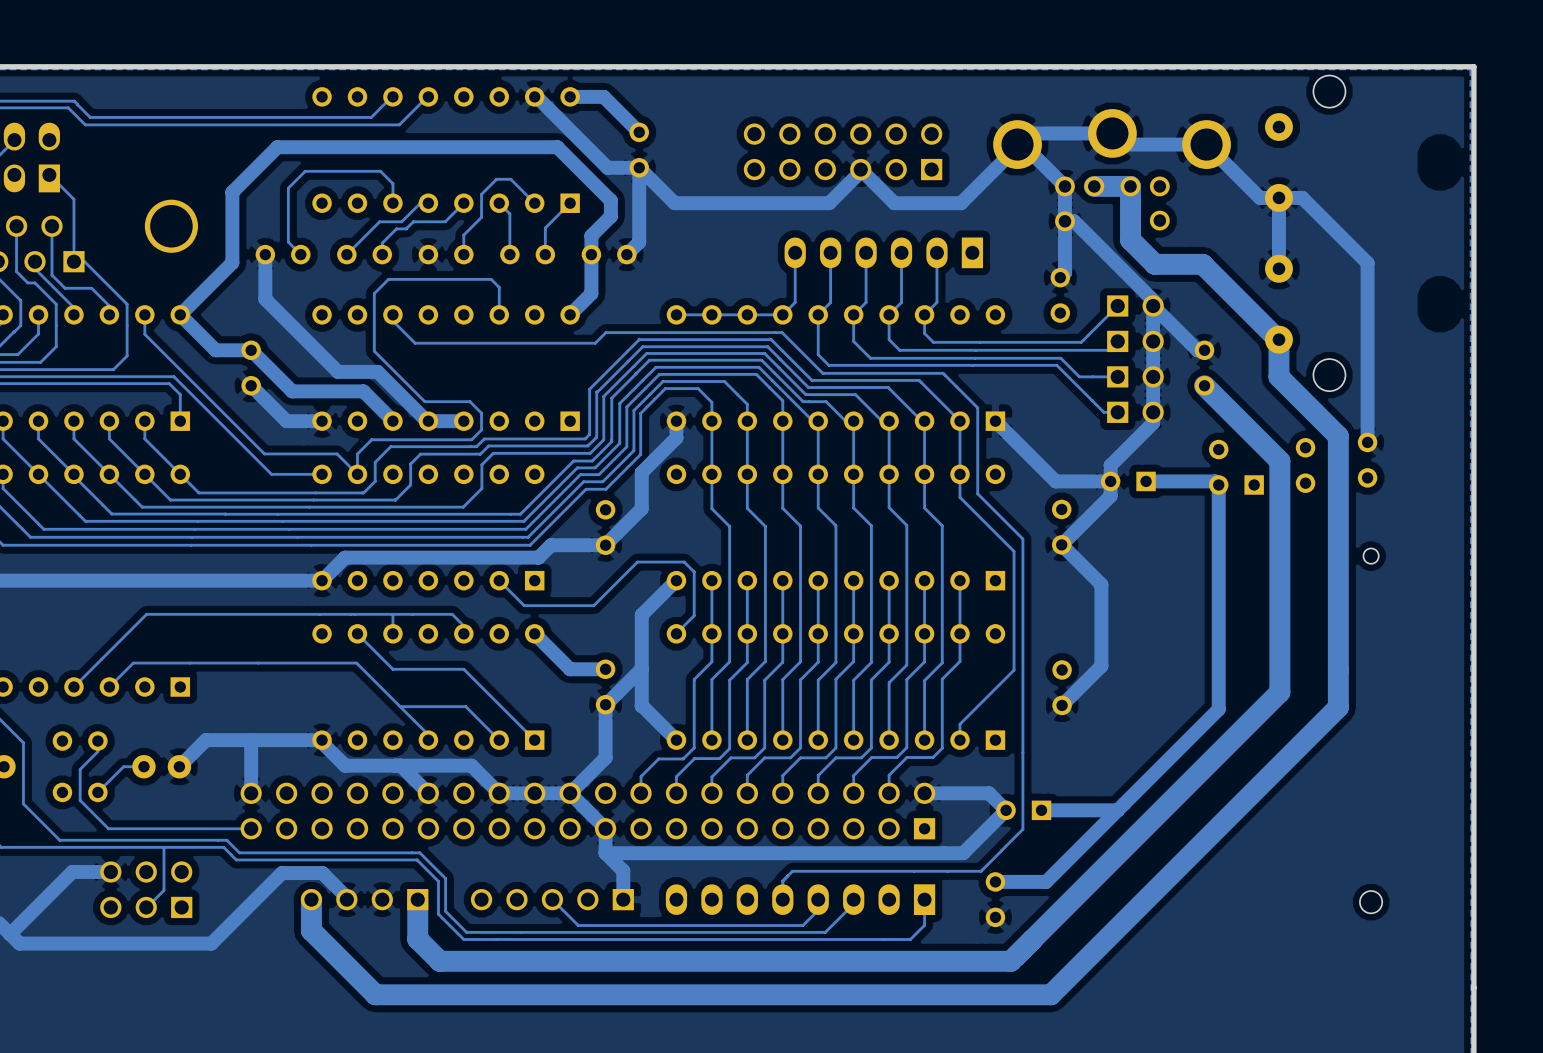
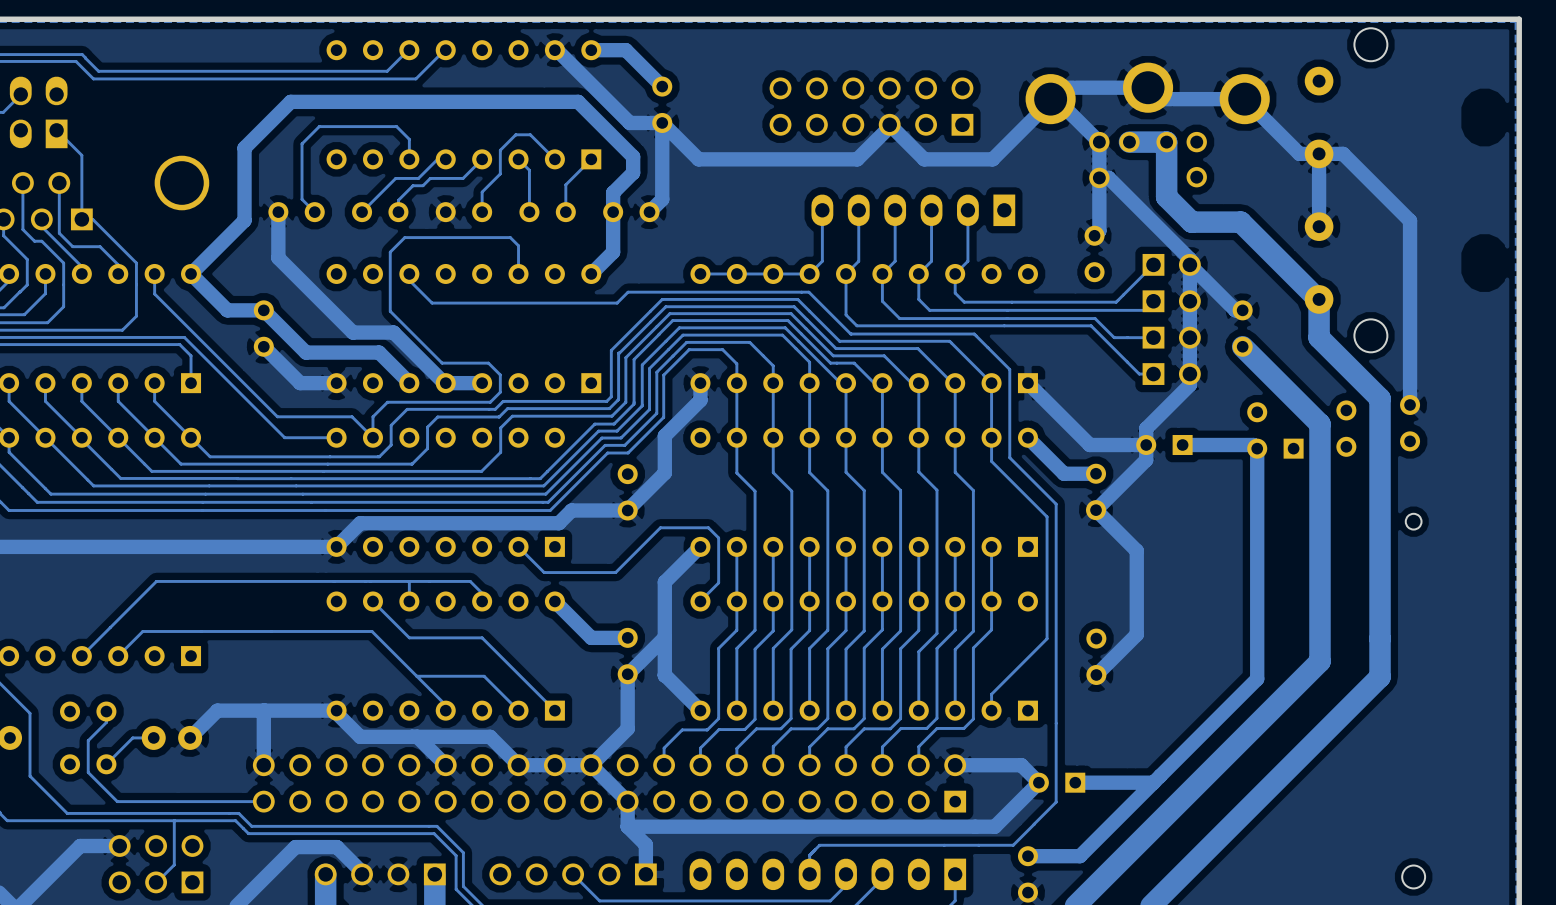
track: none -> (1027, 437) (1063, 473) (1096, 473)

